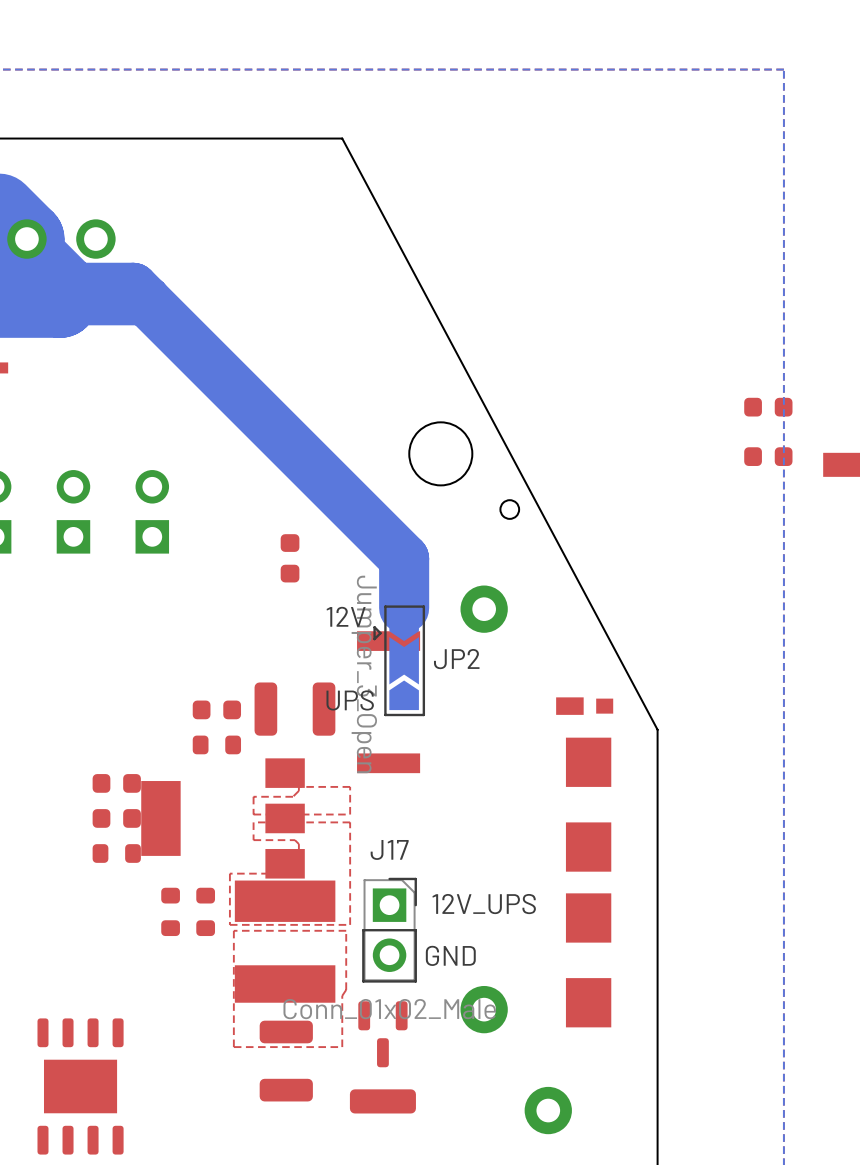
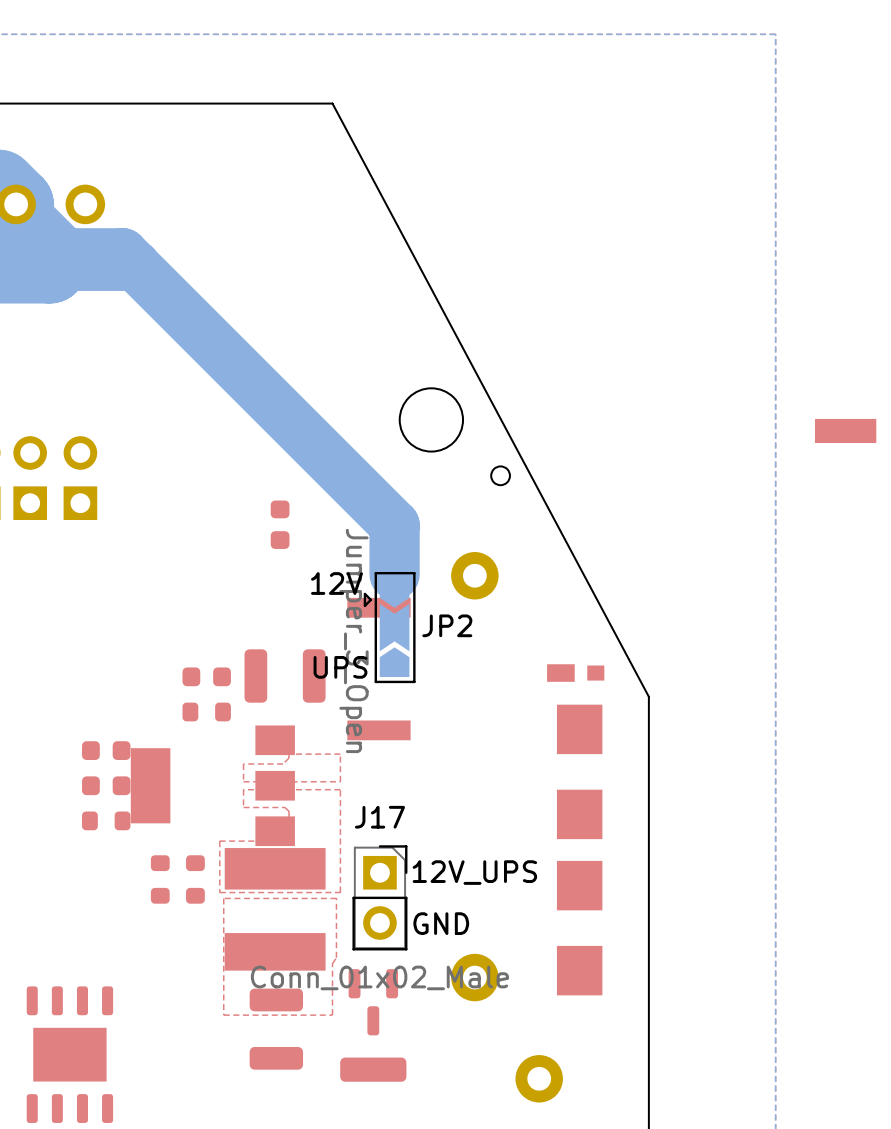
part: (768, 407) -> none
part: (768, 456) -> none
part: none -> (30, 478)
part: (73, 511) -> none
part: none -> (80, 478)
part: (152, 511) -> none

